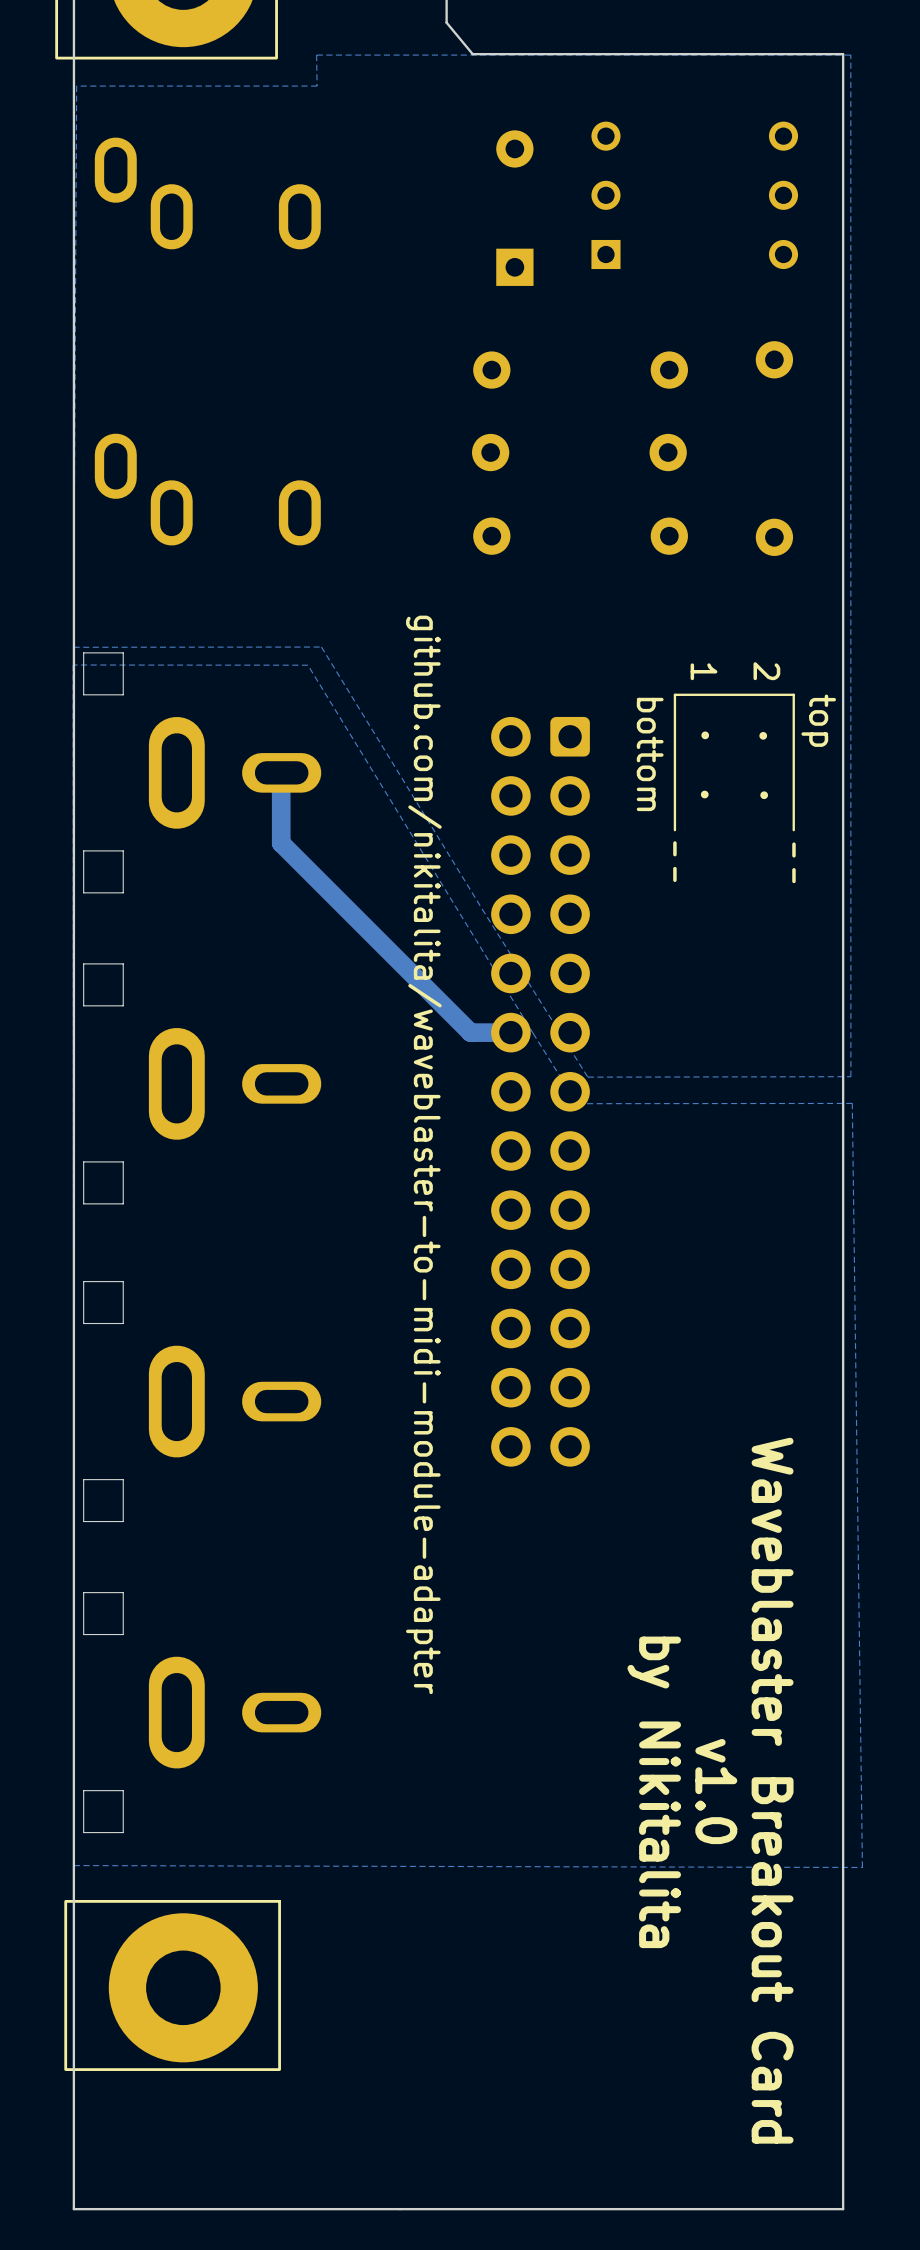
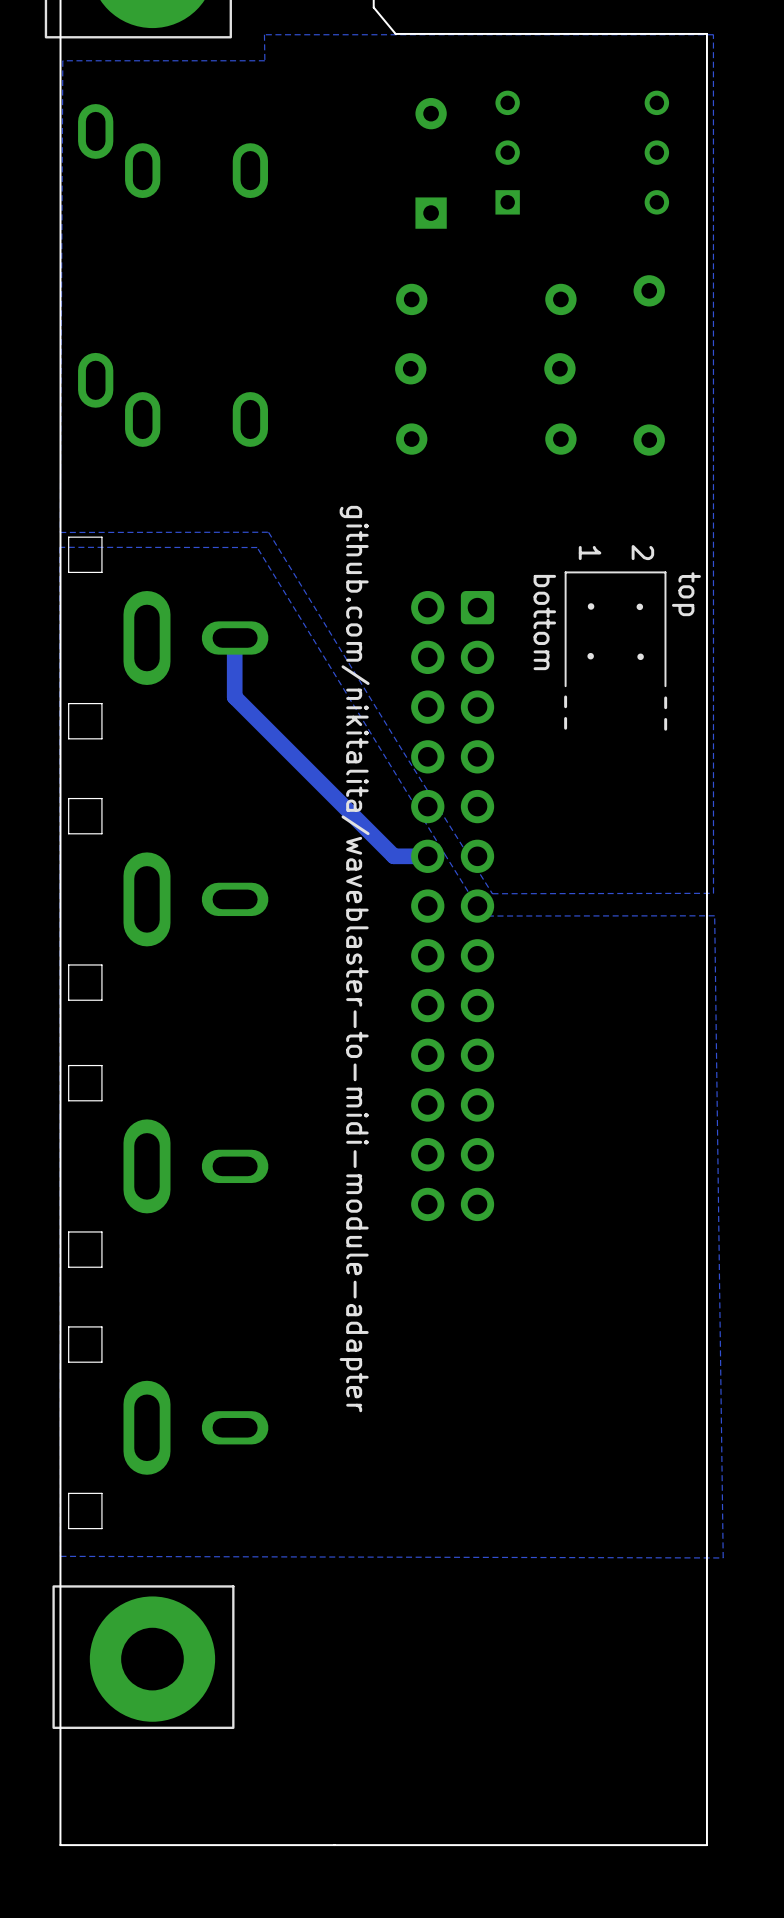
text: Waveblaster Breakout Card (772, 1790) -> none
text: v1.0 (716, 1791) -> none
text: by Nikitalita (654, 1792) -> none

